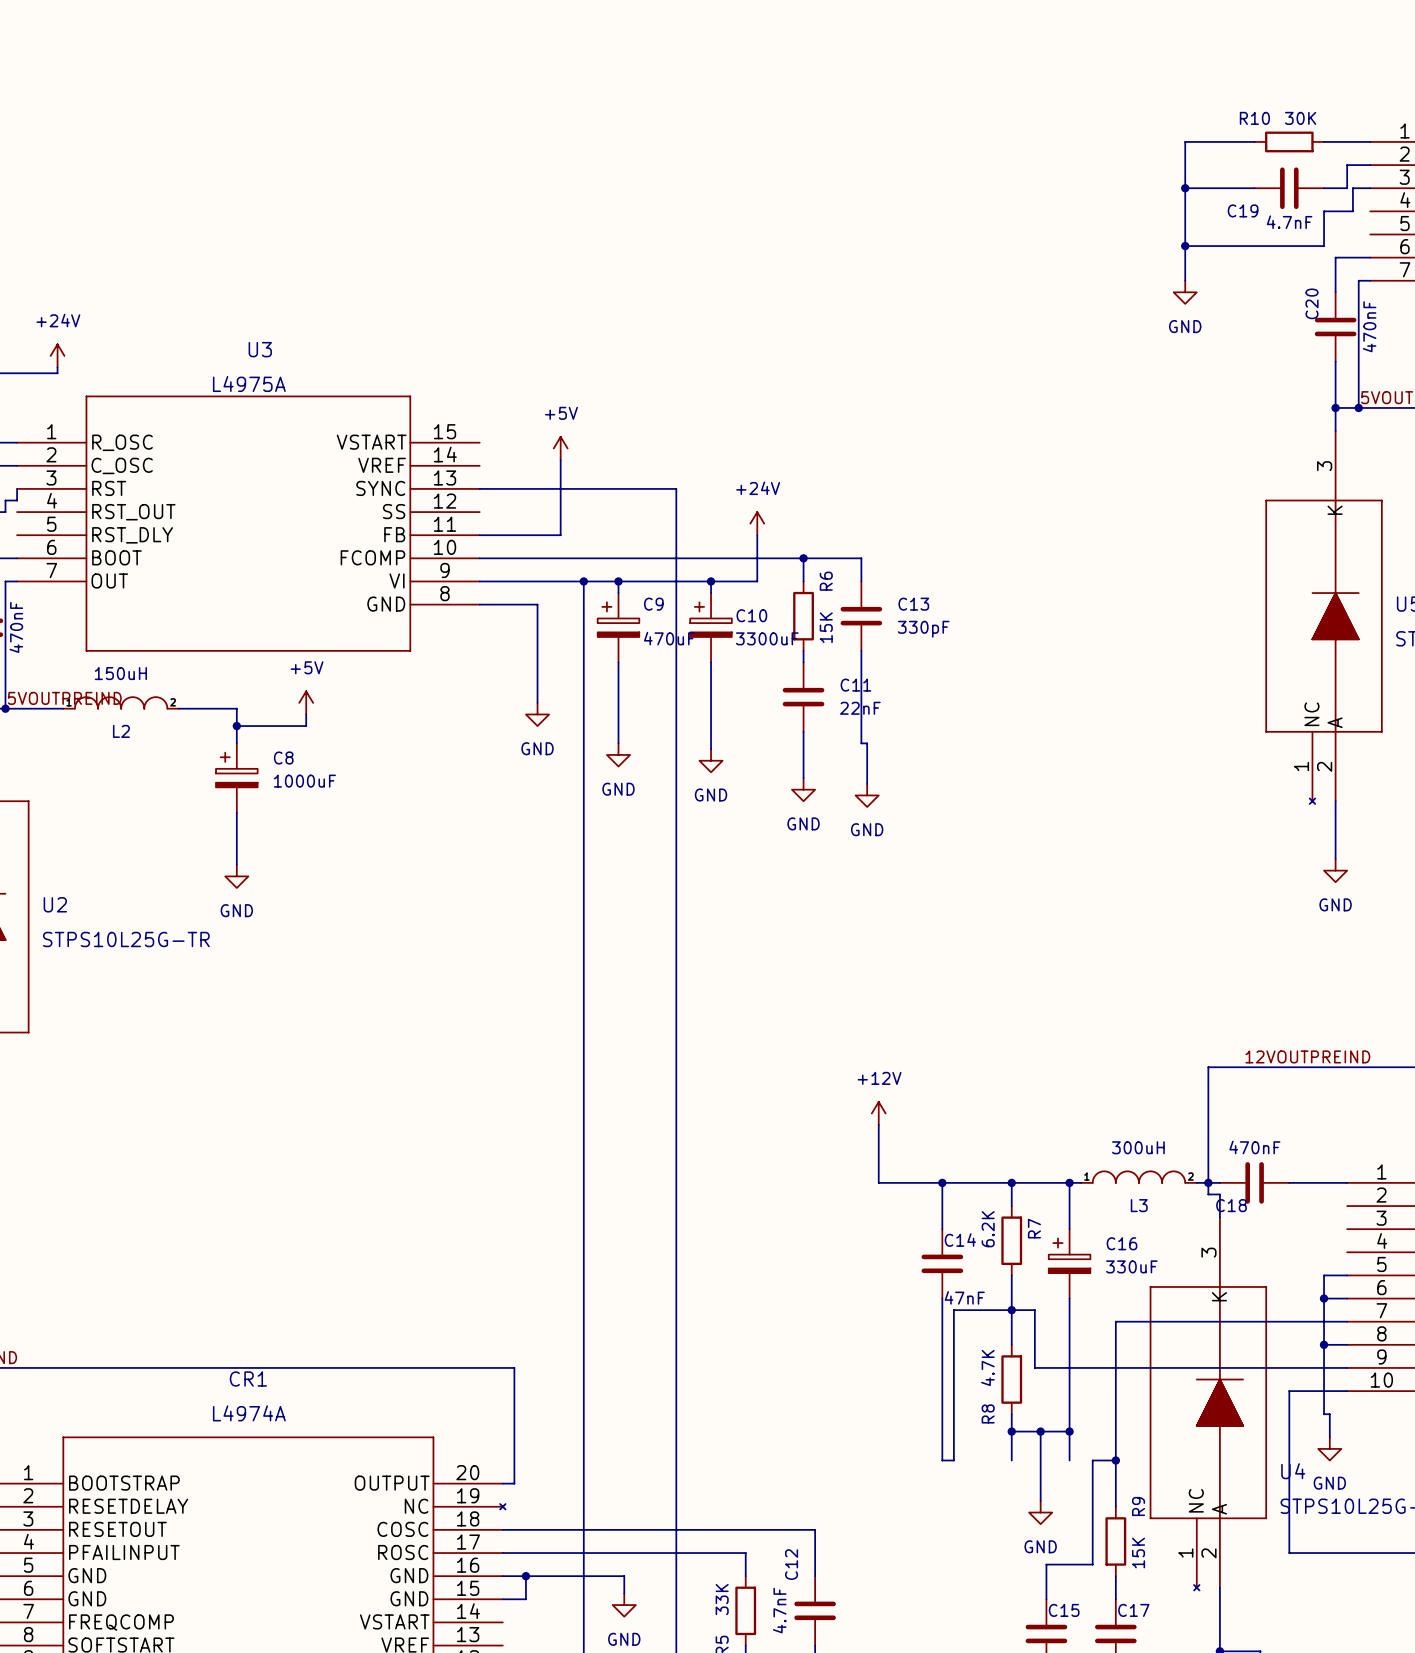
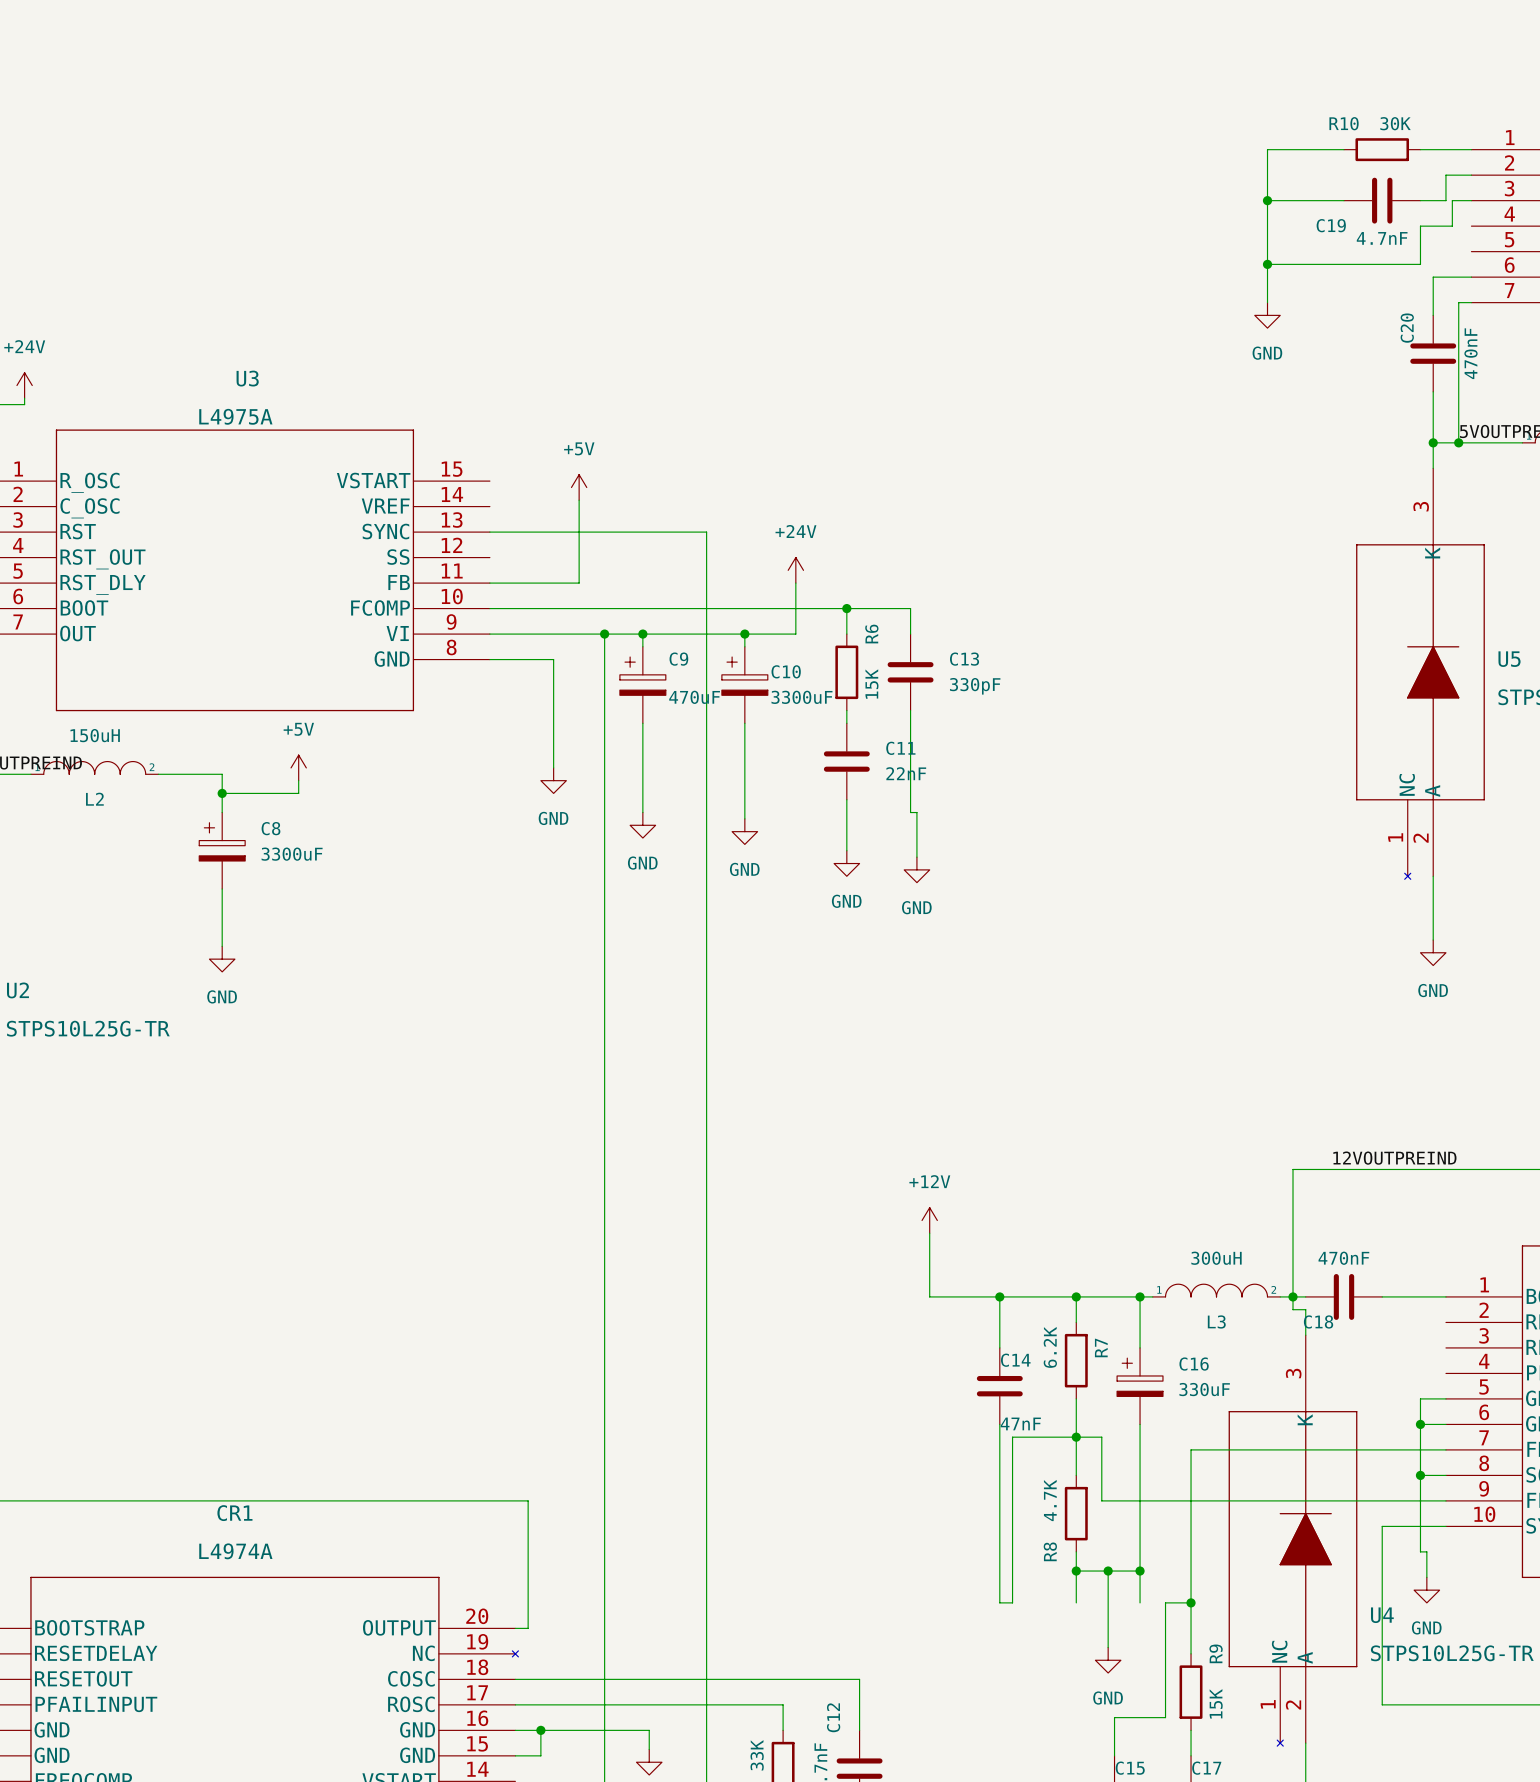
C8 value: 1000uF (304, 781) -> 3300uF (292, 854)

